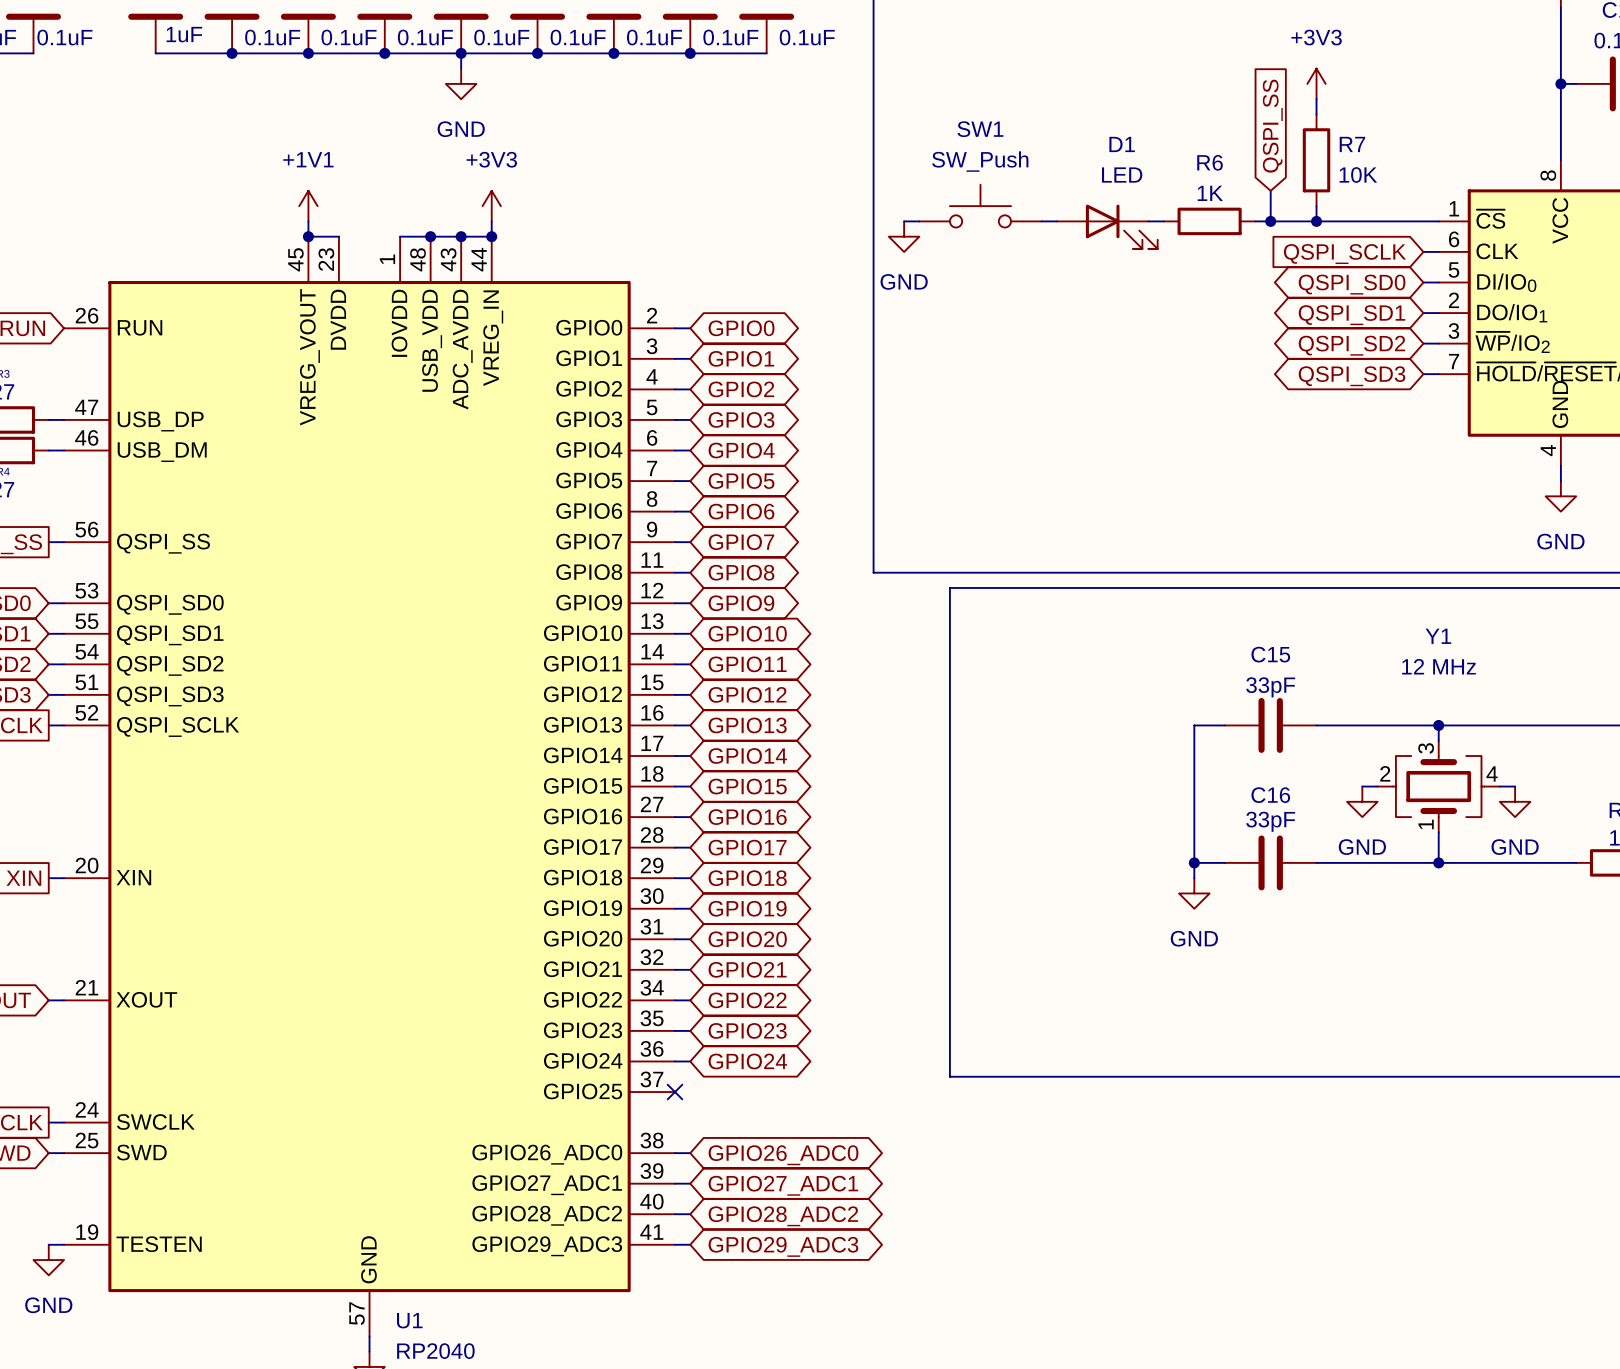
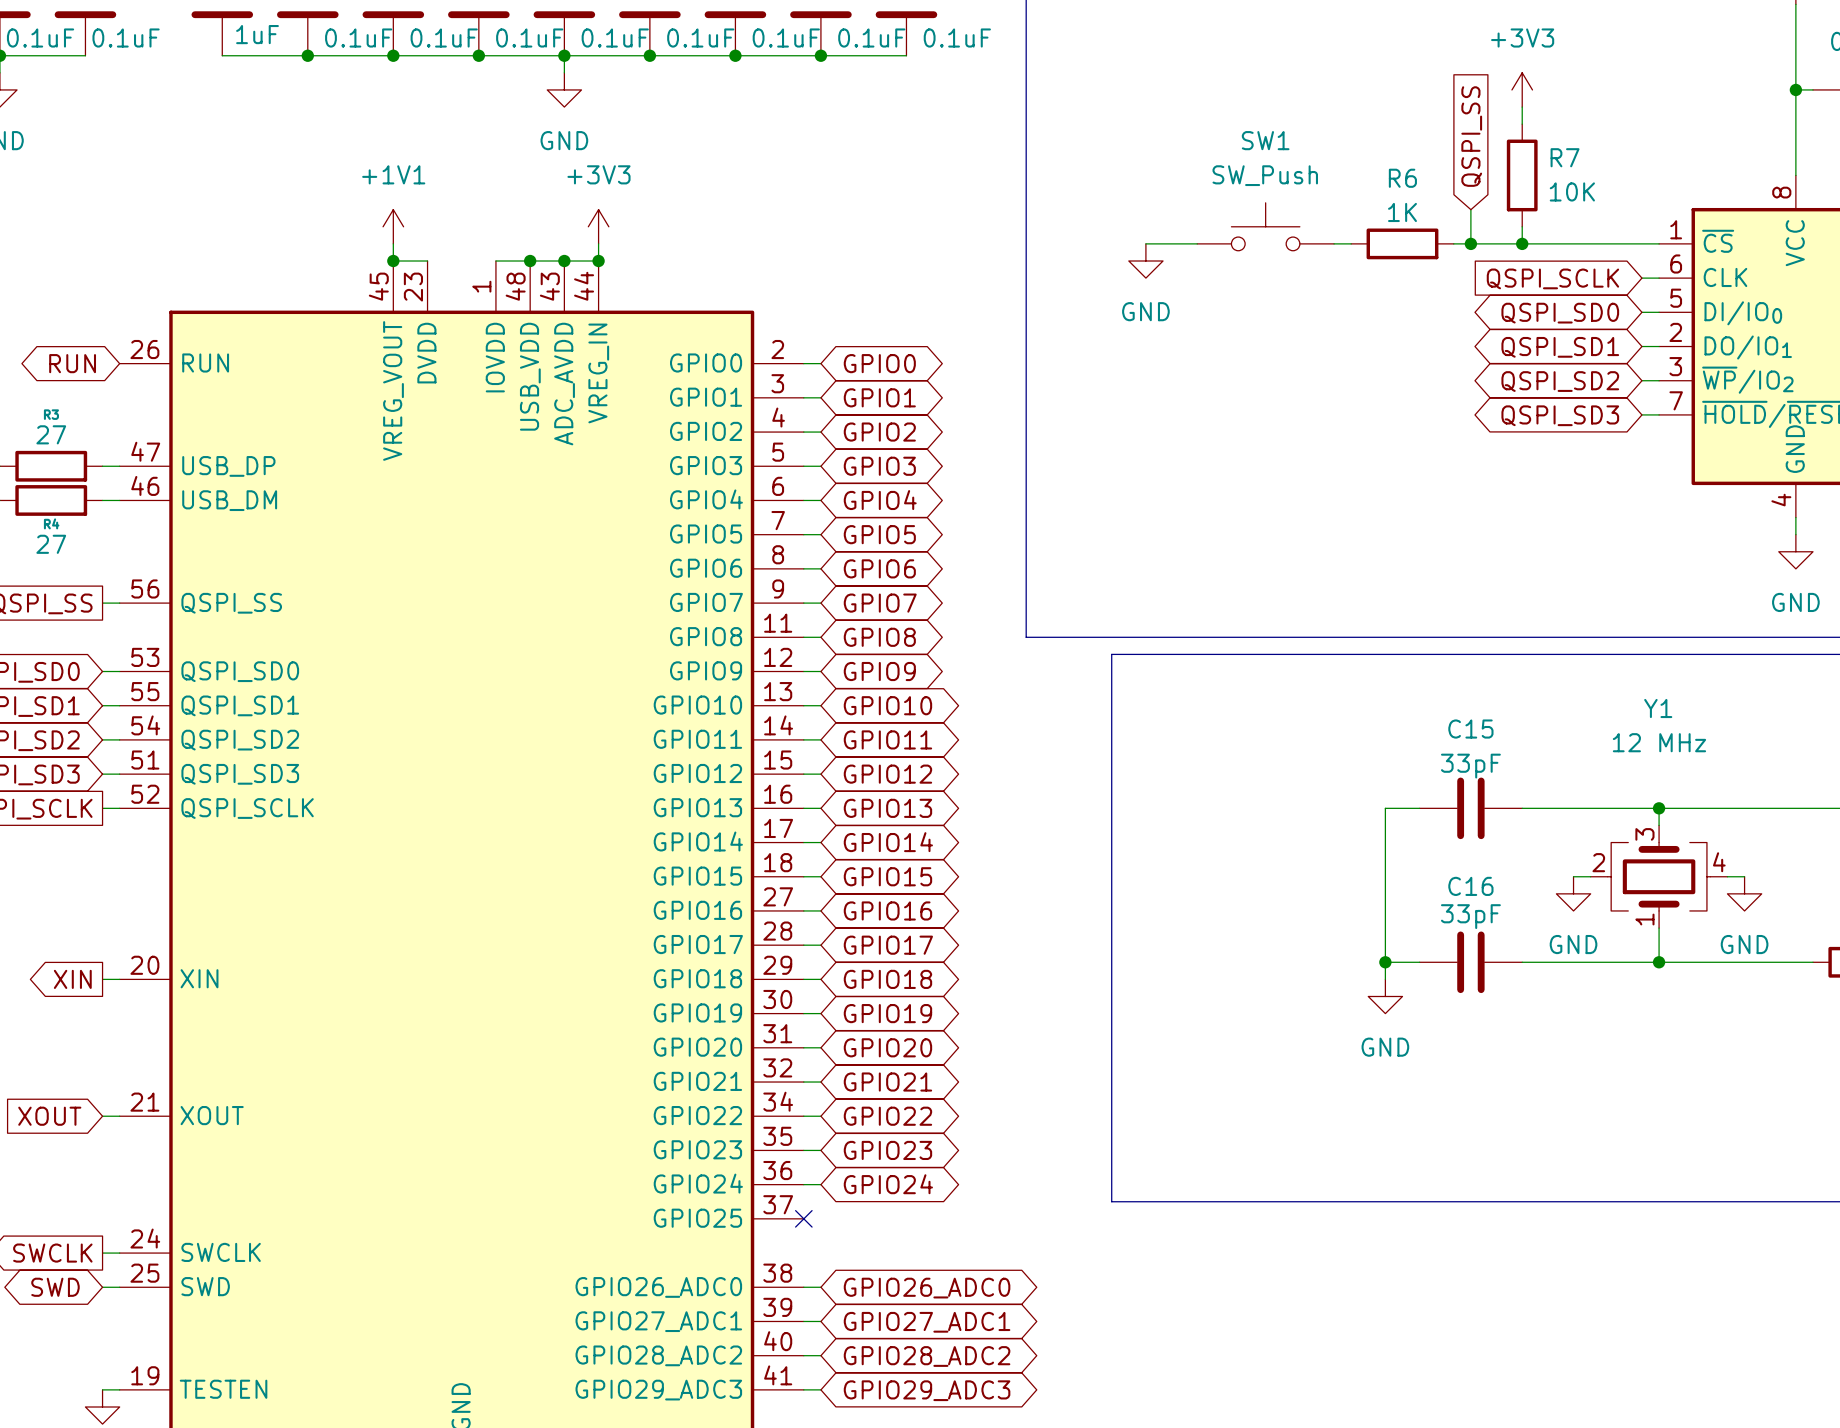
SW1 position: (980, 206) -> (1265, 226)
wire: (904, 221) (919, 221) -> none
wire: none -> (1145, 243) (1197, 243)
D1: LED (1107, 226) -> none
power symbol position: GND (904, 236) -> GND (1145, 261)

